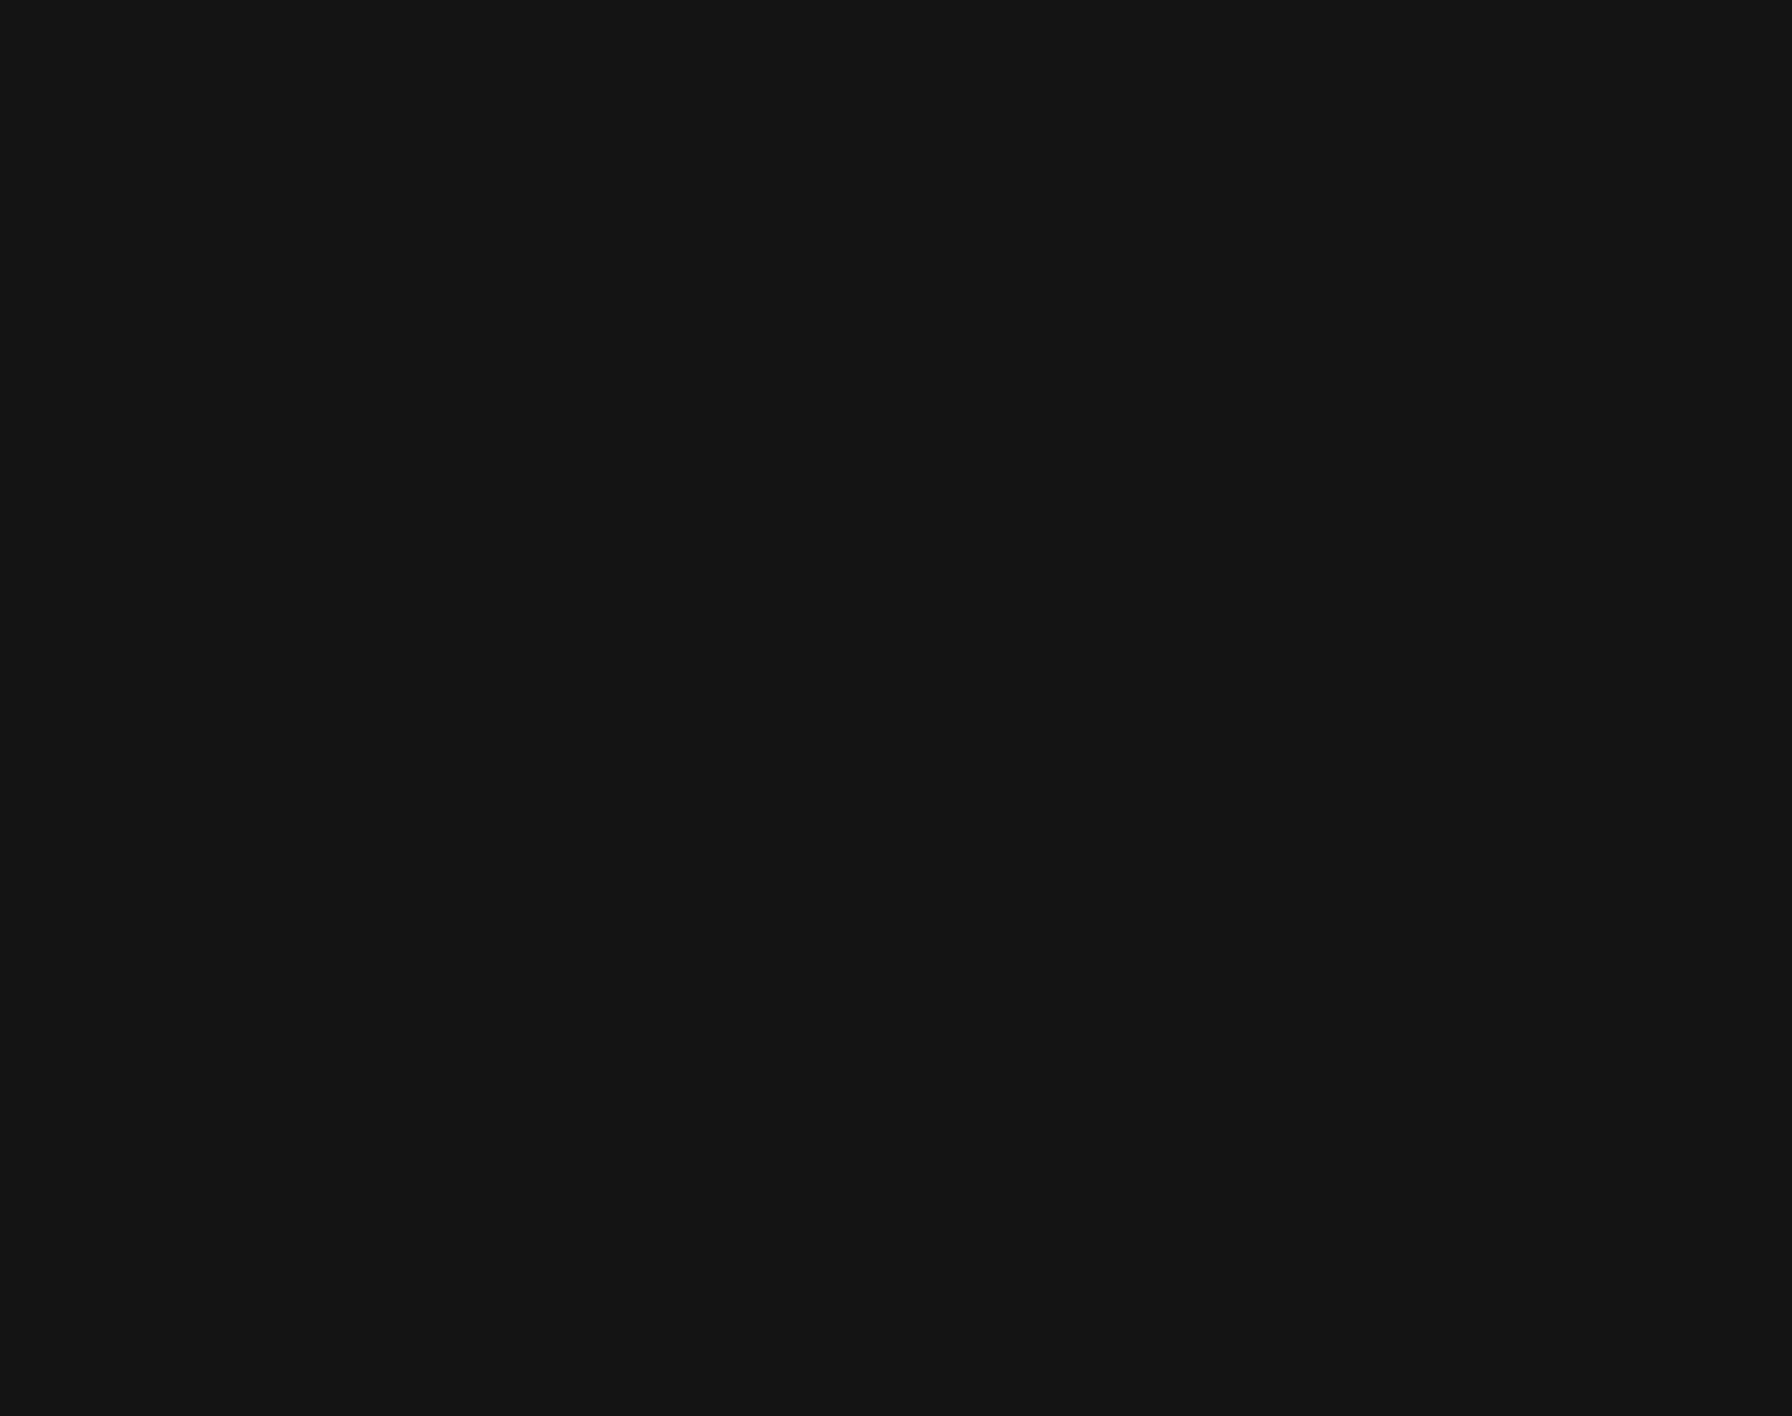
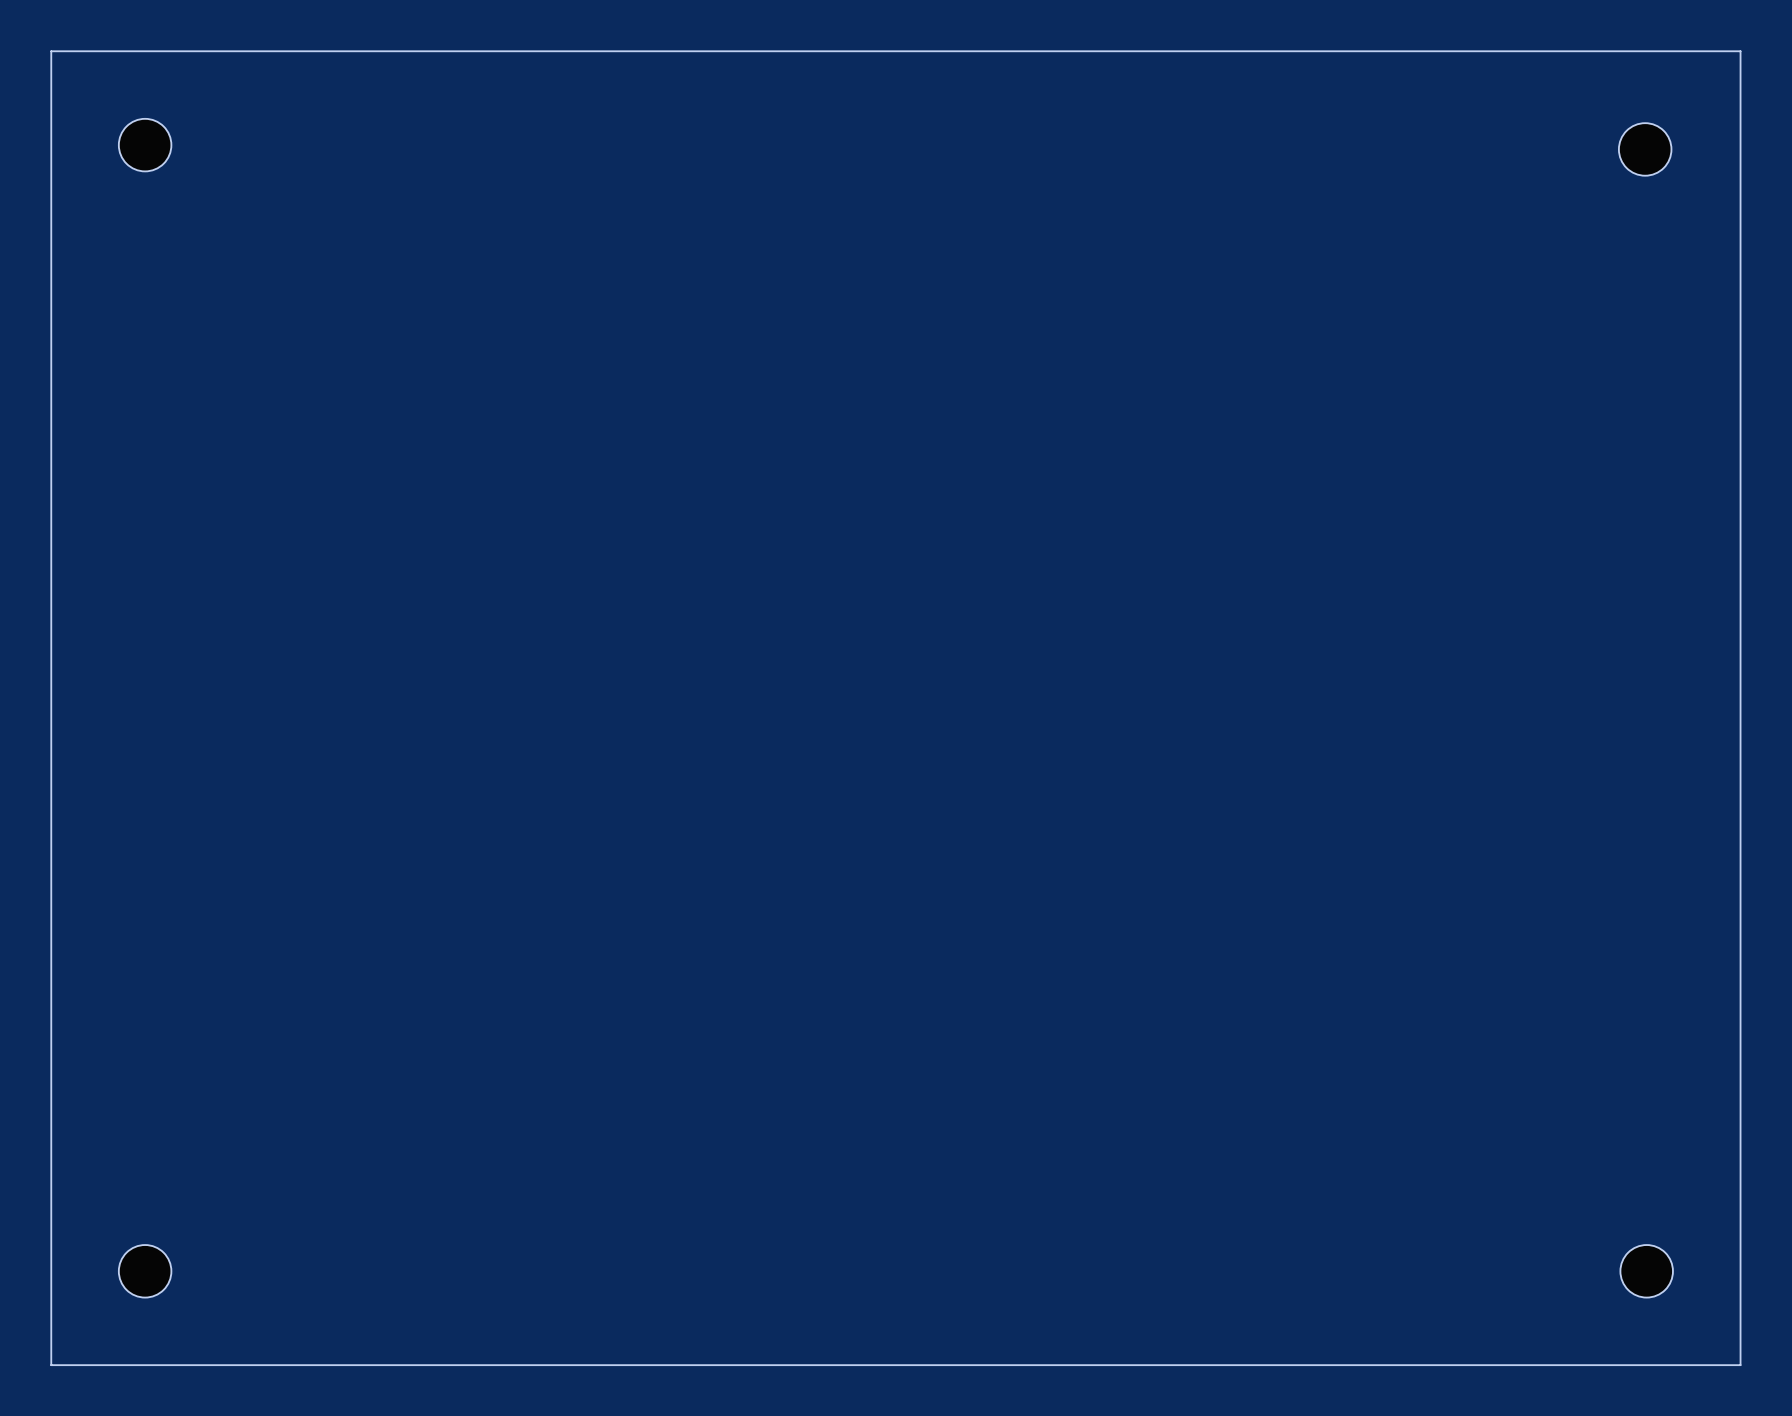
board edge: none -> (1740, 51) (51, 51) (51, 1365) (1740, 1365) (1740, 51)
part: none -> (145, 145)
part: none -> (1645, 149)
part: none -> (145, 1271)
part: none -> (1646, 1271)

